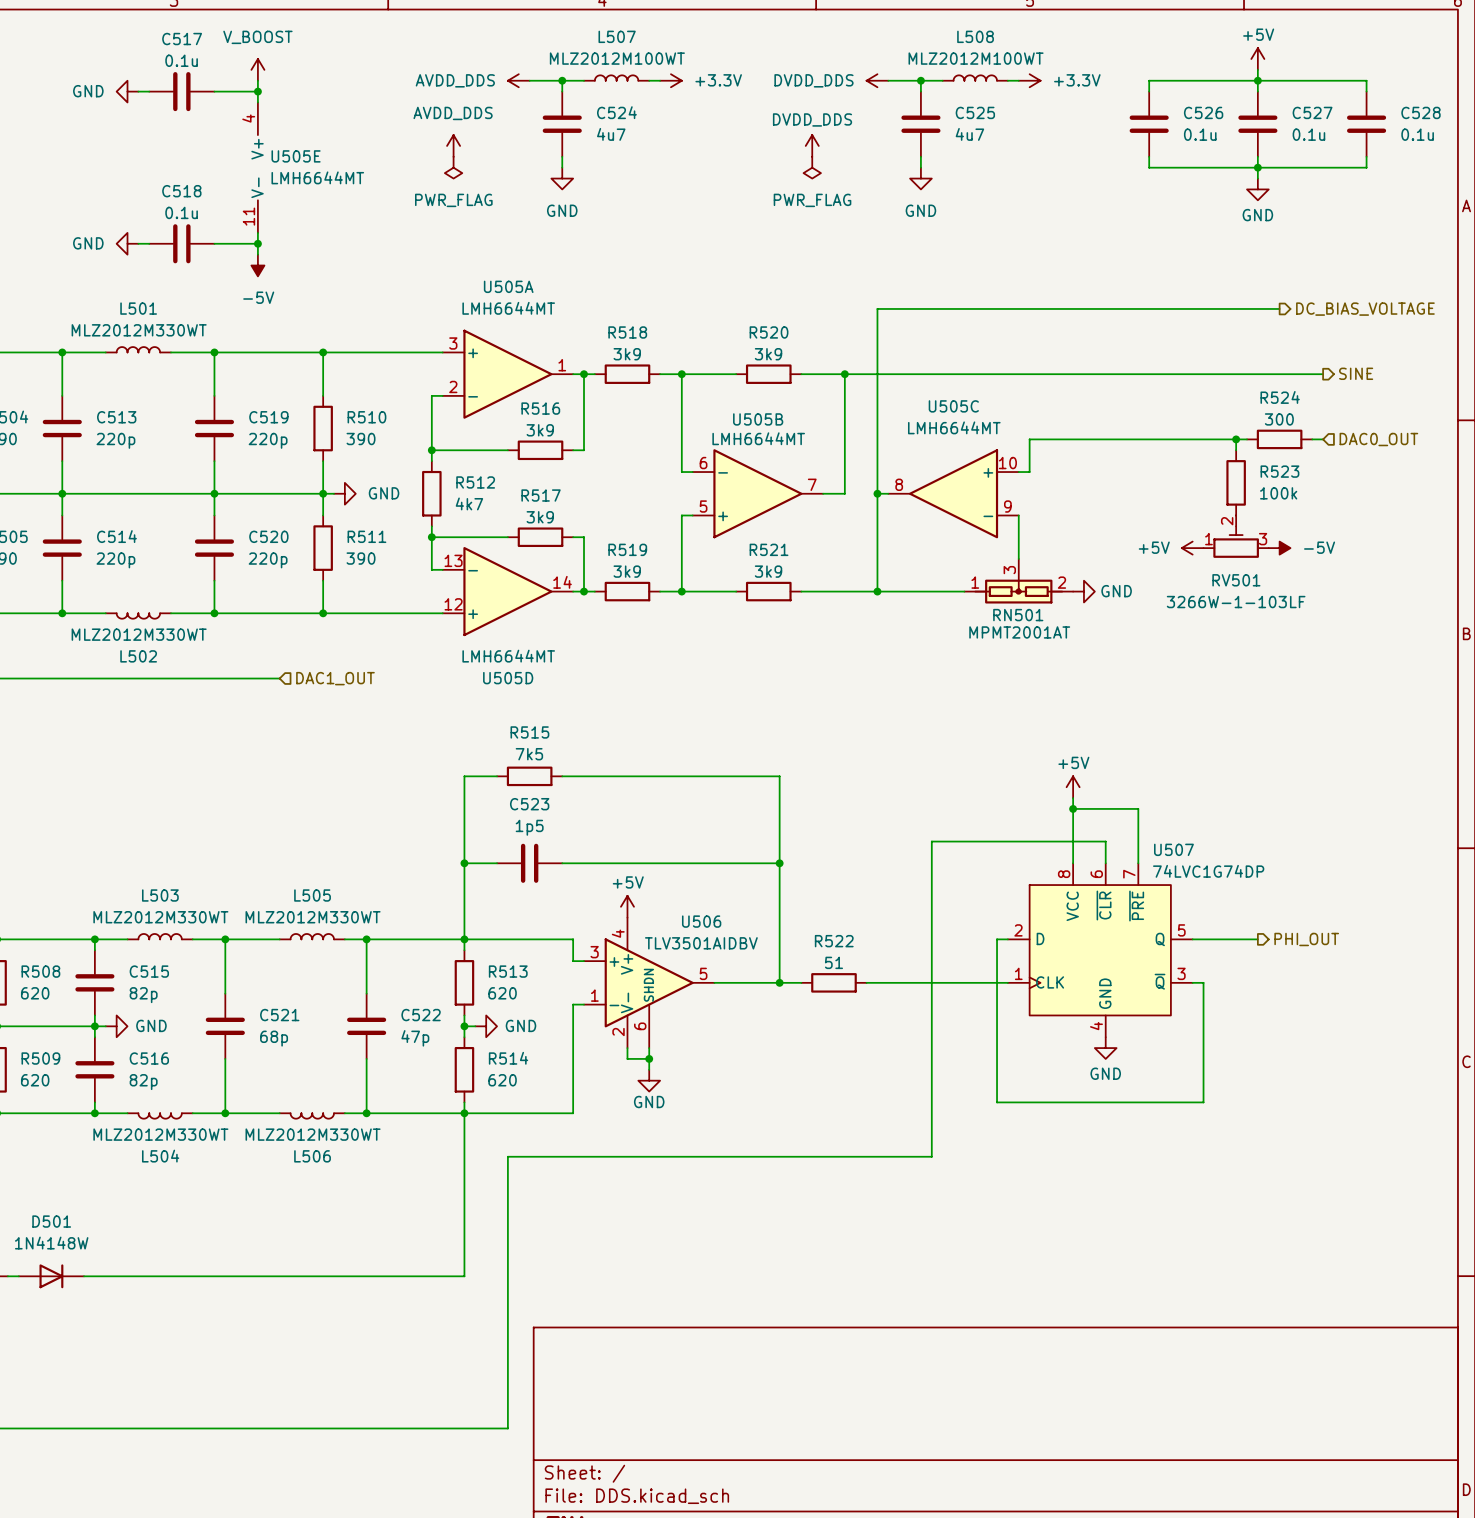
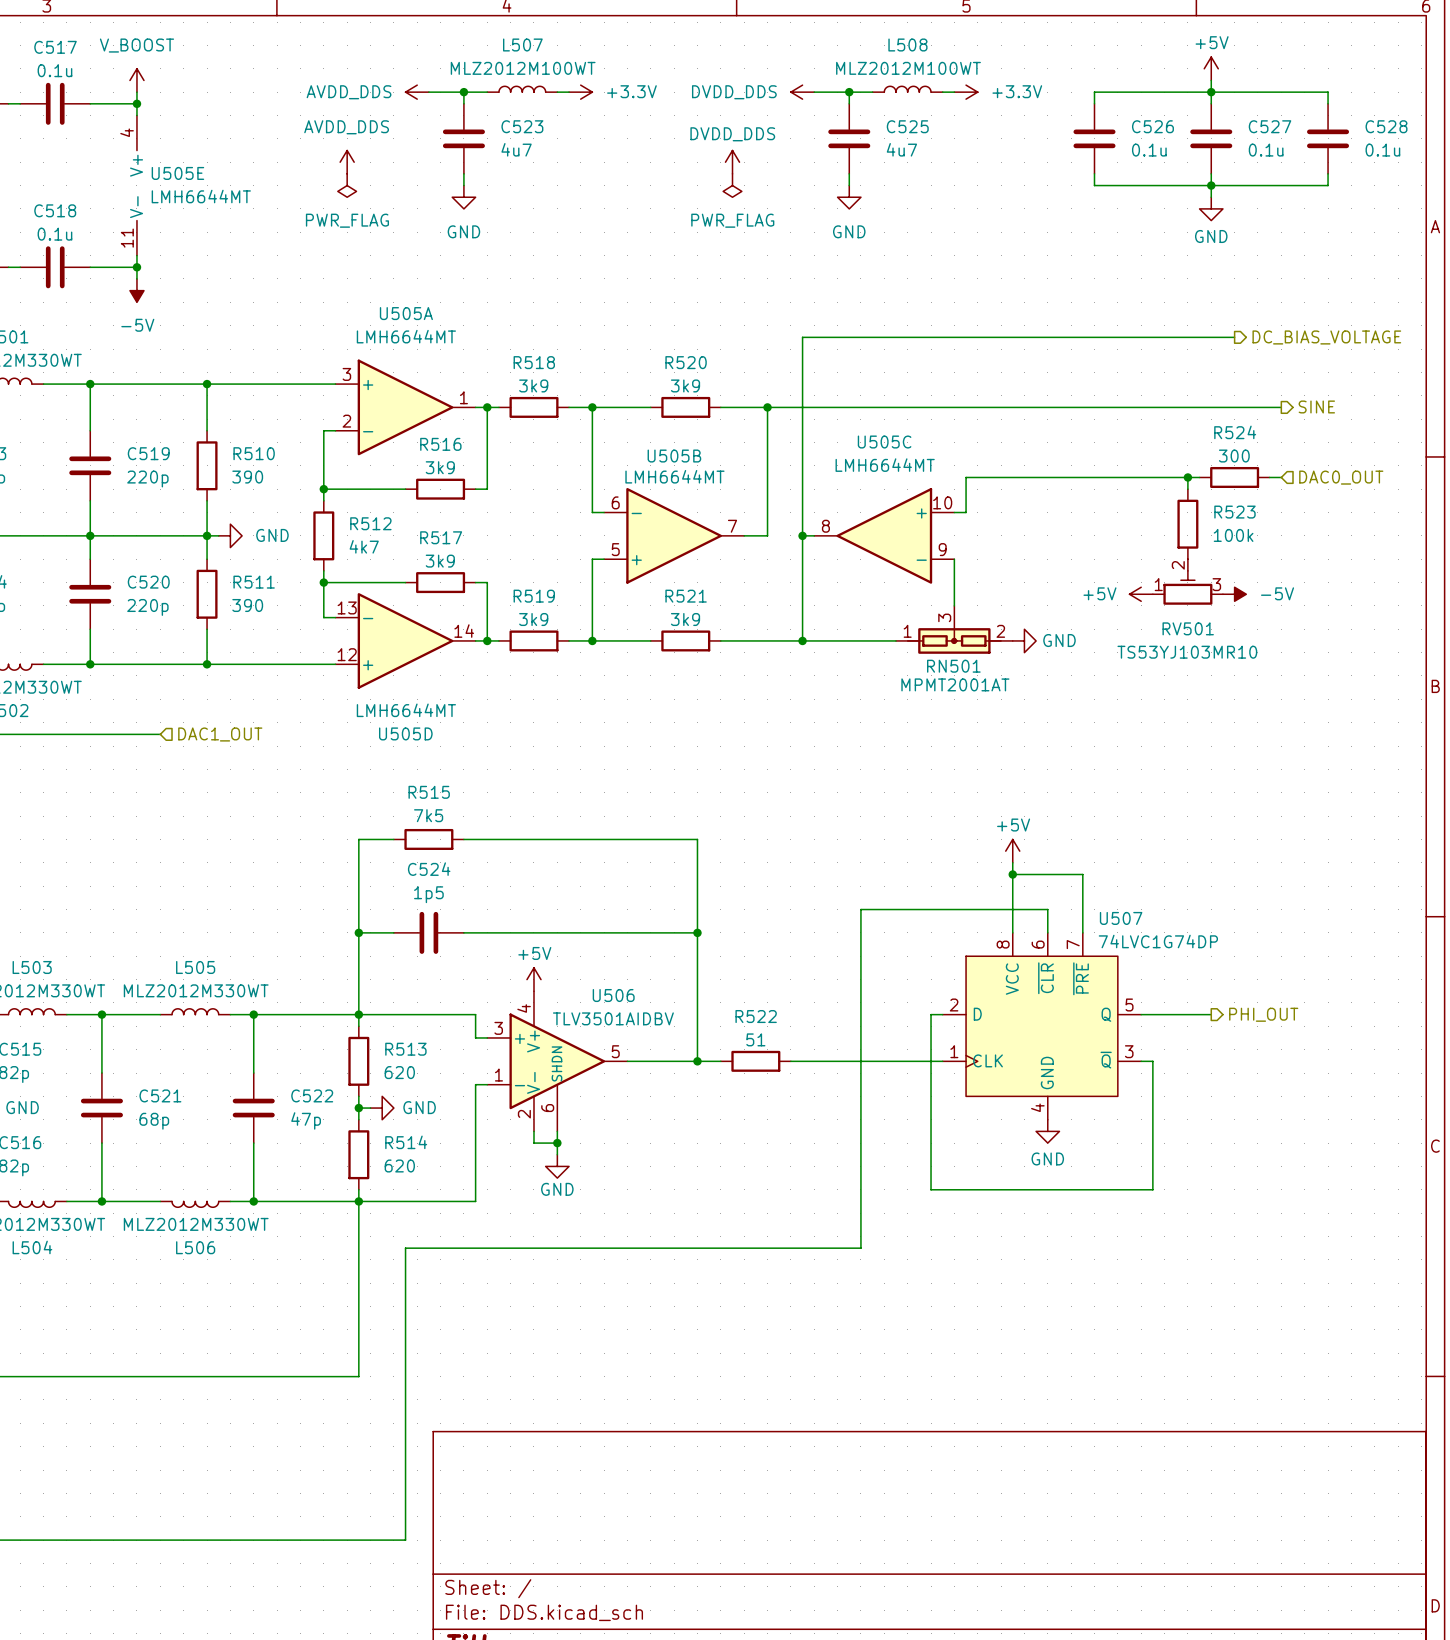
C524 name: C524 (616, 112) -> C523 (522, 126)
RV501 value: 3266W-1-103LF (1236, 602) -> TS53YJ103MR10 (1187, 652)
C523 name: C523 (529, 804) -> C524 (429, 869)

